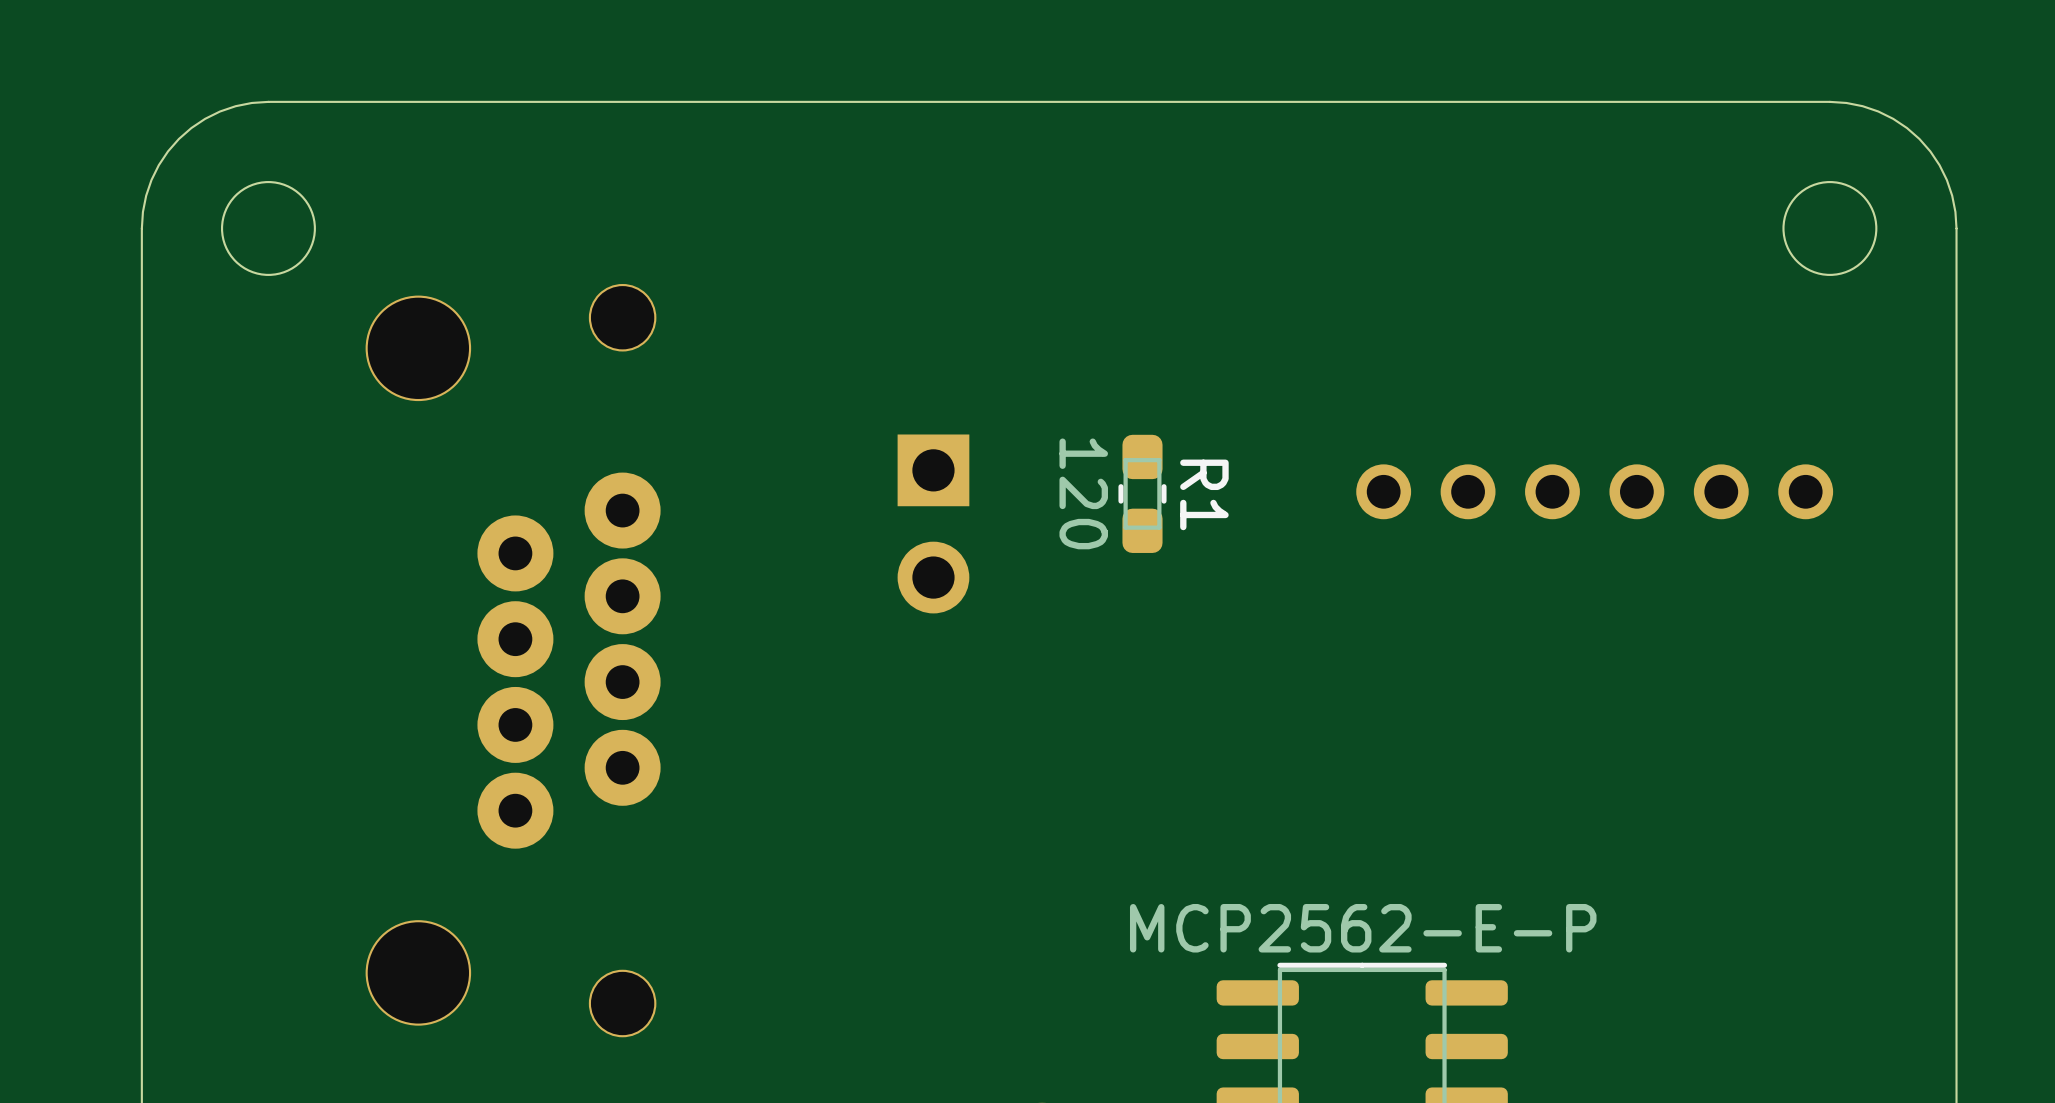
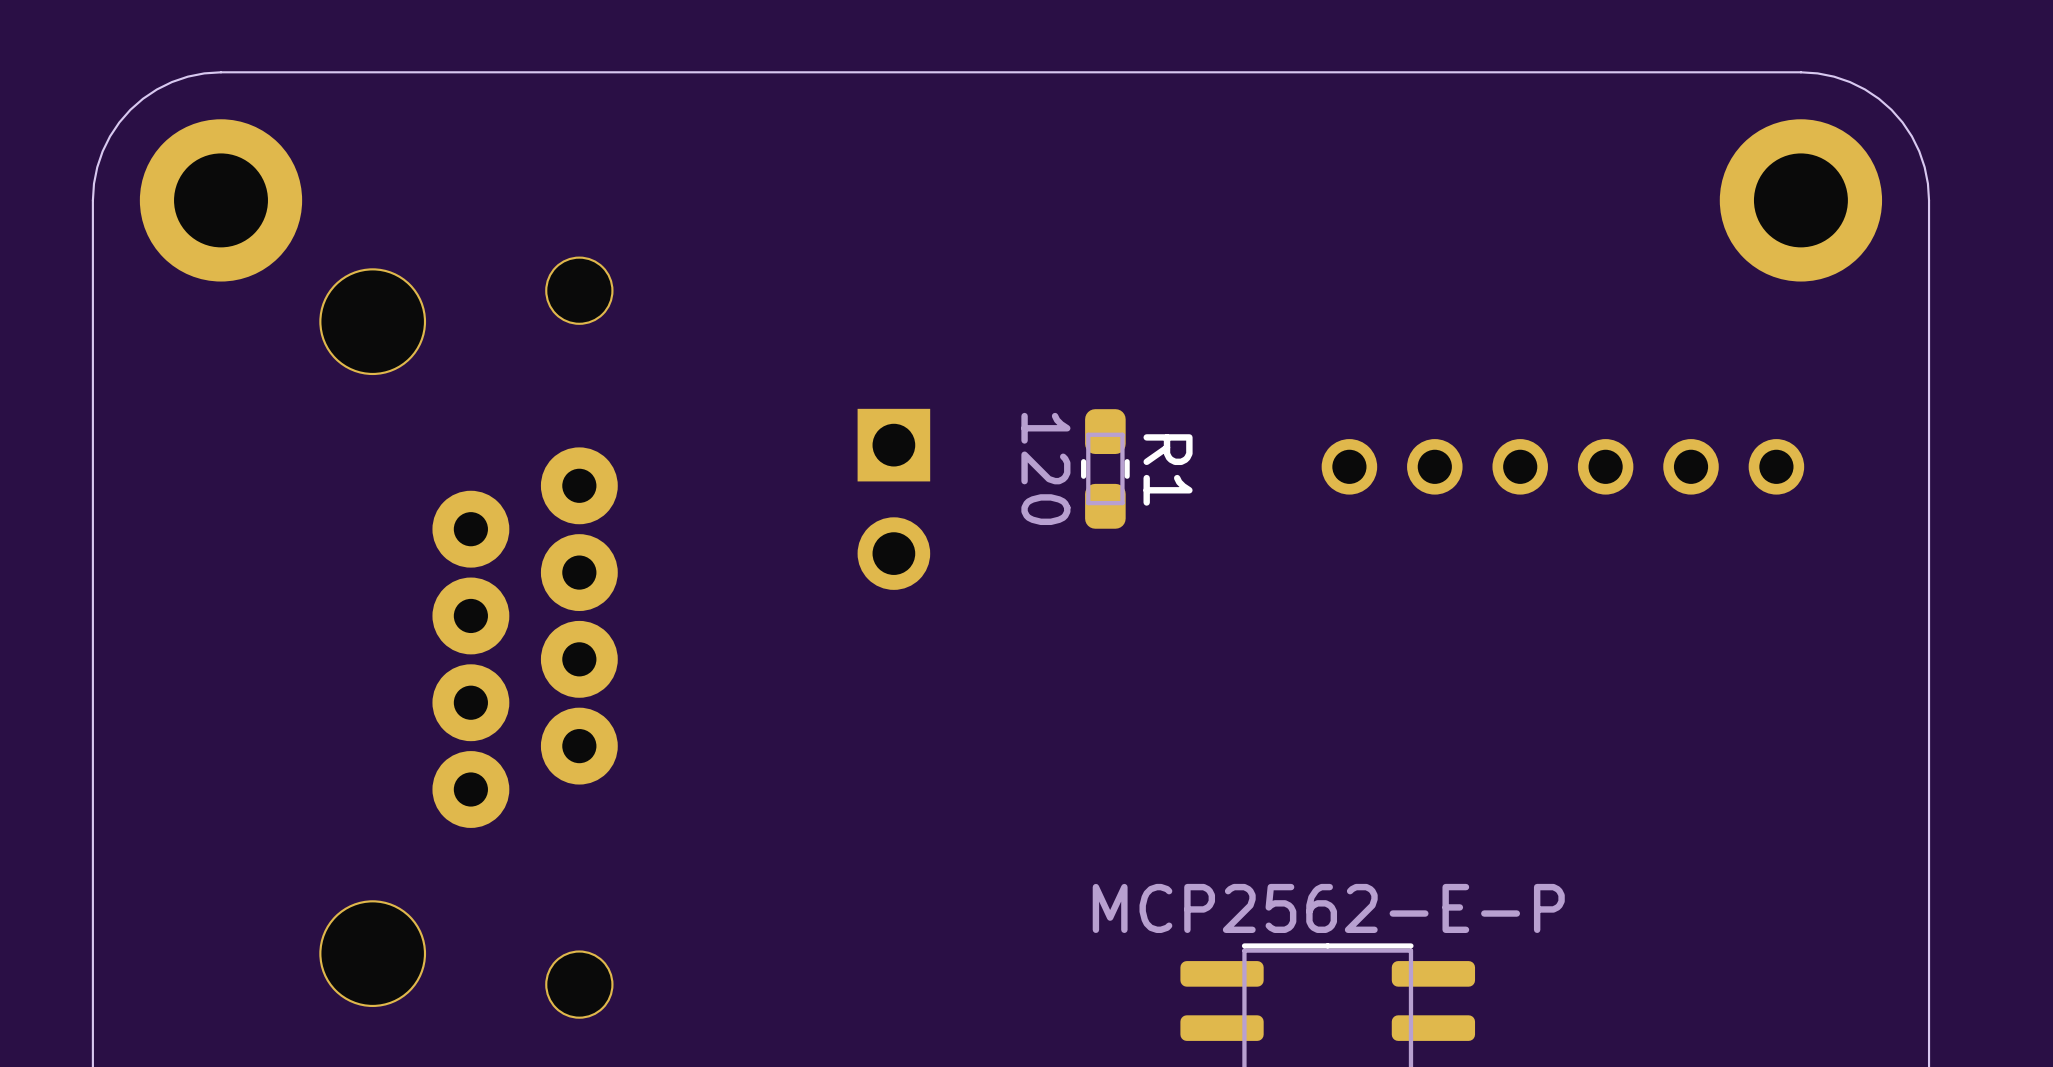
round board edge: [220, 181, 316, 276] -> none
round board edge: [1782, 181, 1878, 276] -> none
part: none -> (221, 200)
part: none -> (1800, 200)

